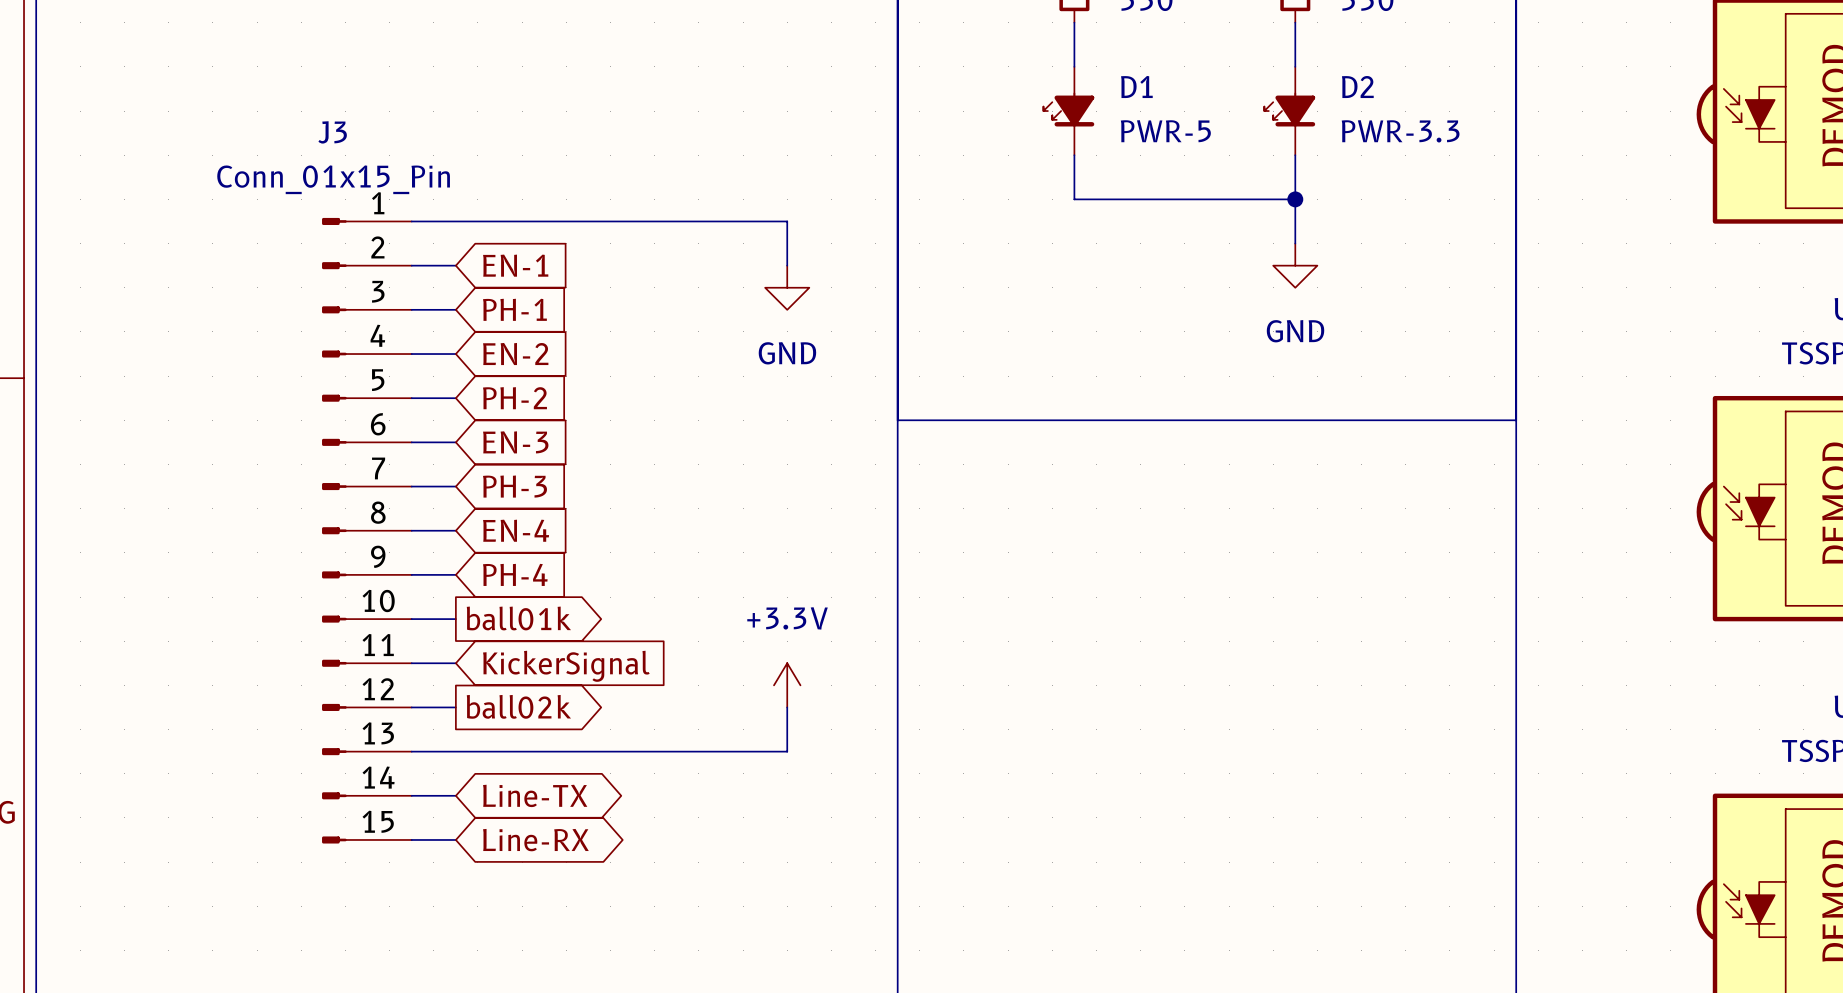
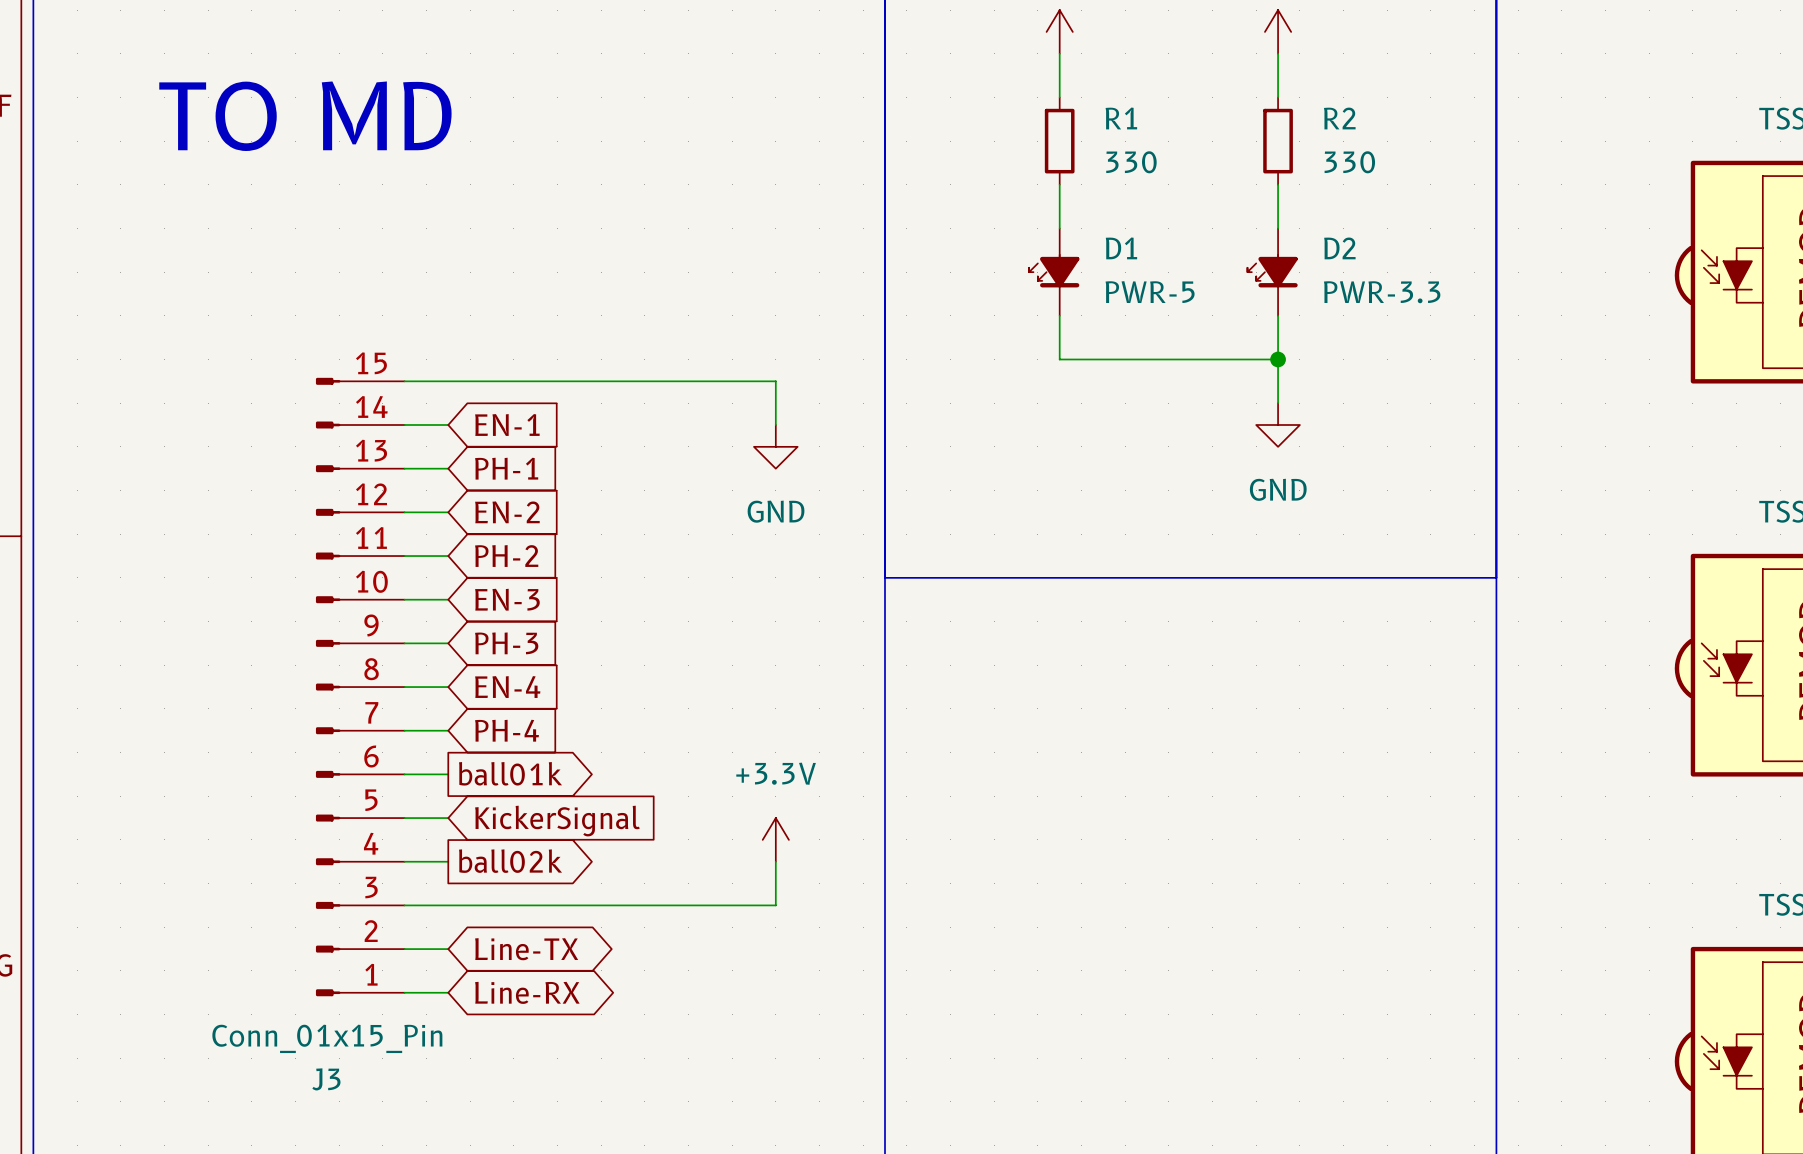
J3 flip: as is (334, 530) -> up-down (328, 687)

